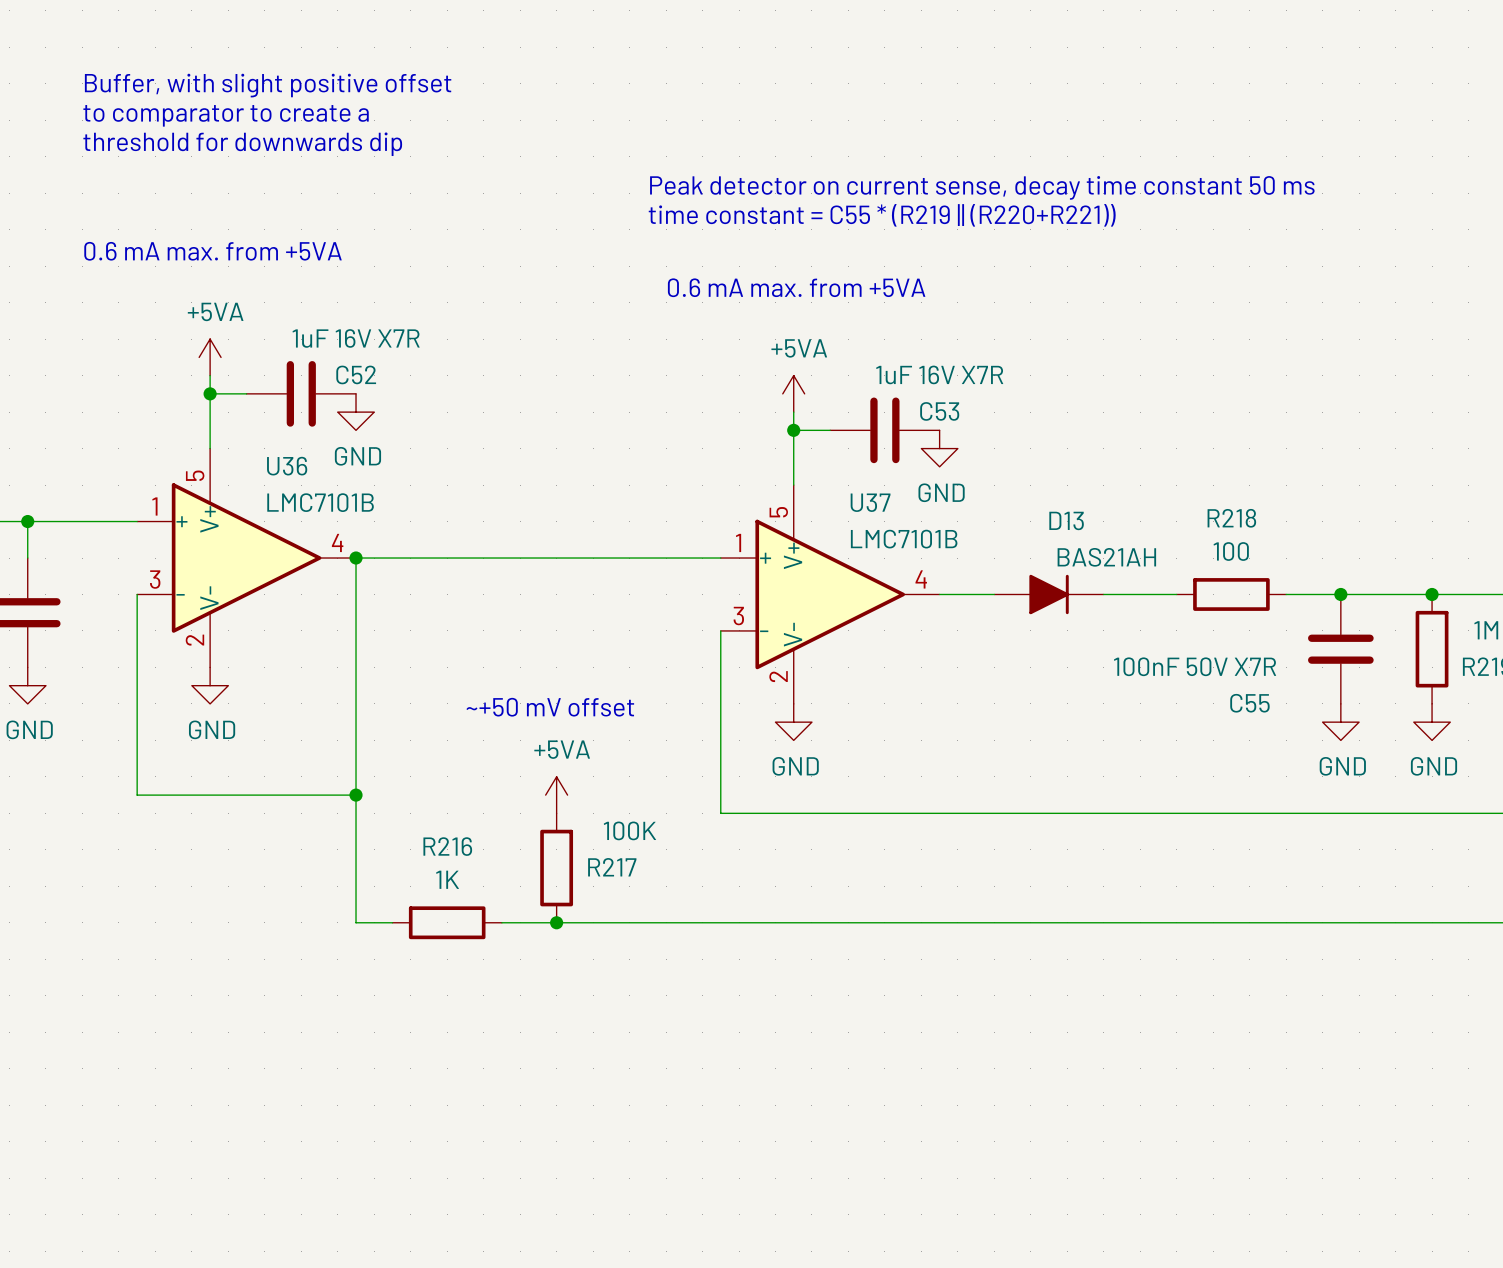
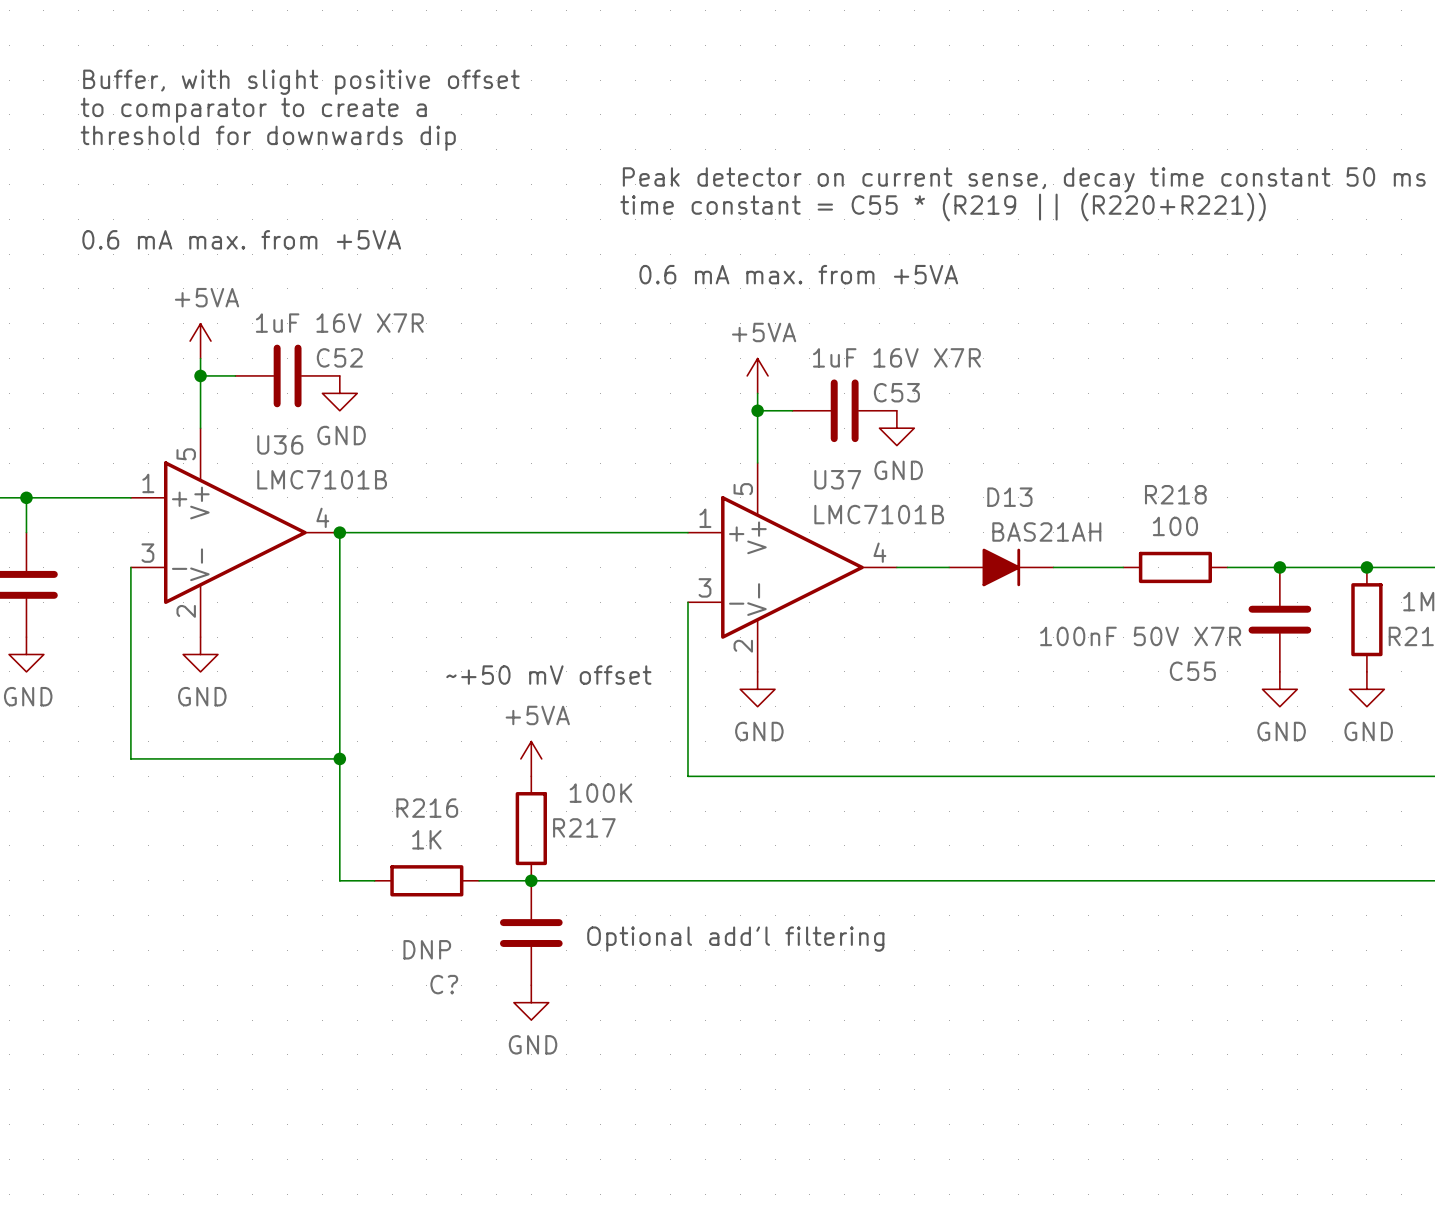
C?: none -> DNP (531, 933)
text: none -> Optional add'l filtering (735, 939)
power symbol: none -> GND (531, 1002)

